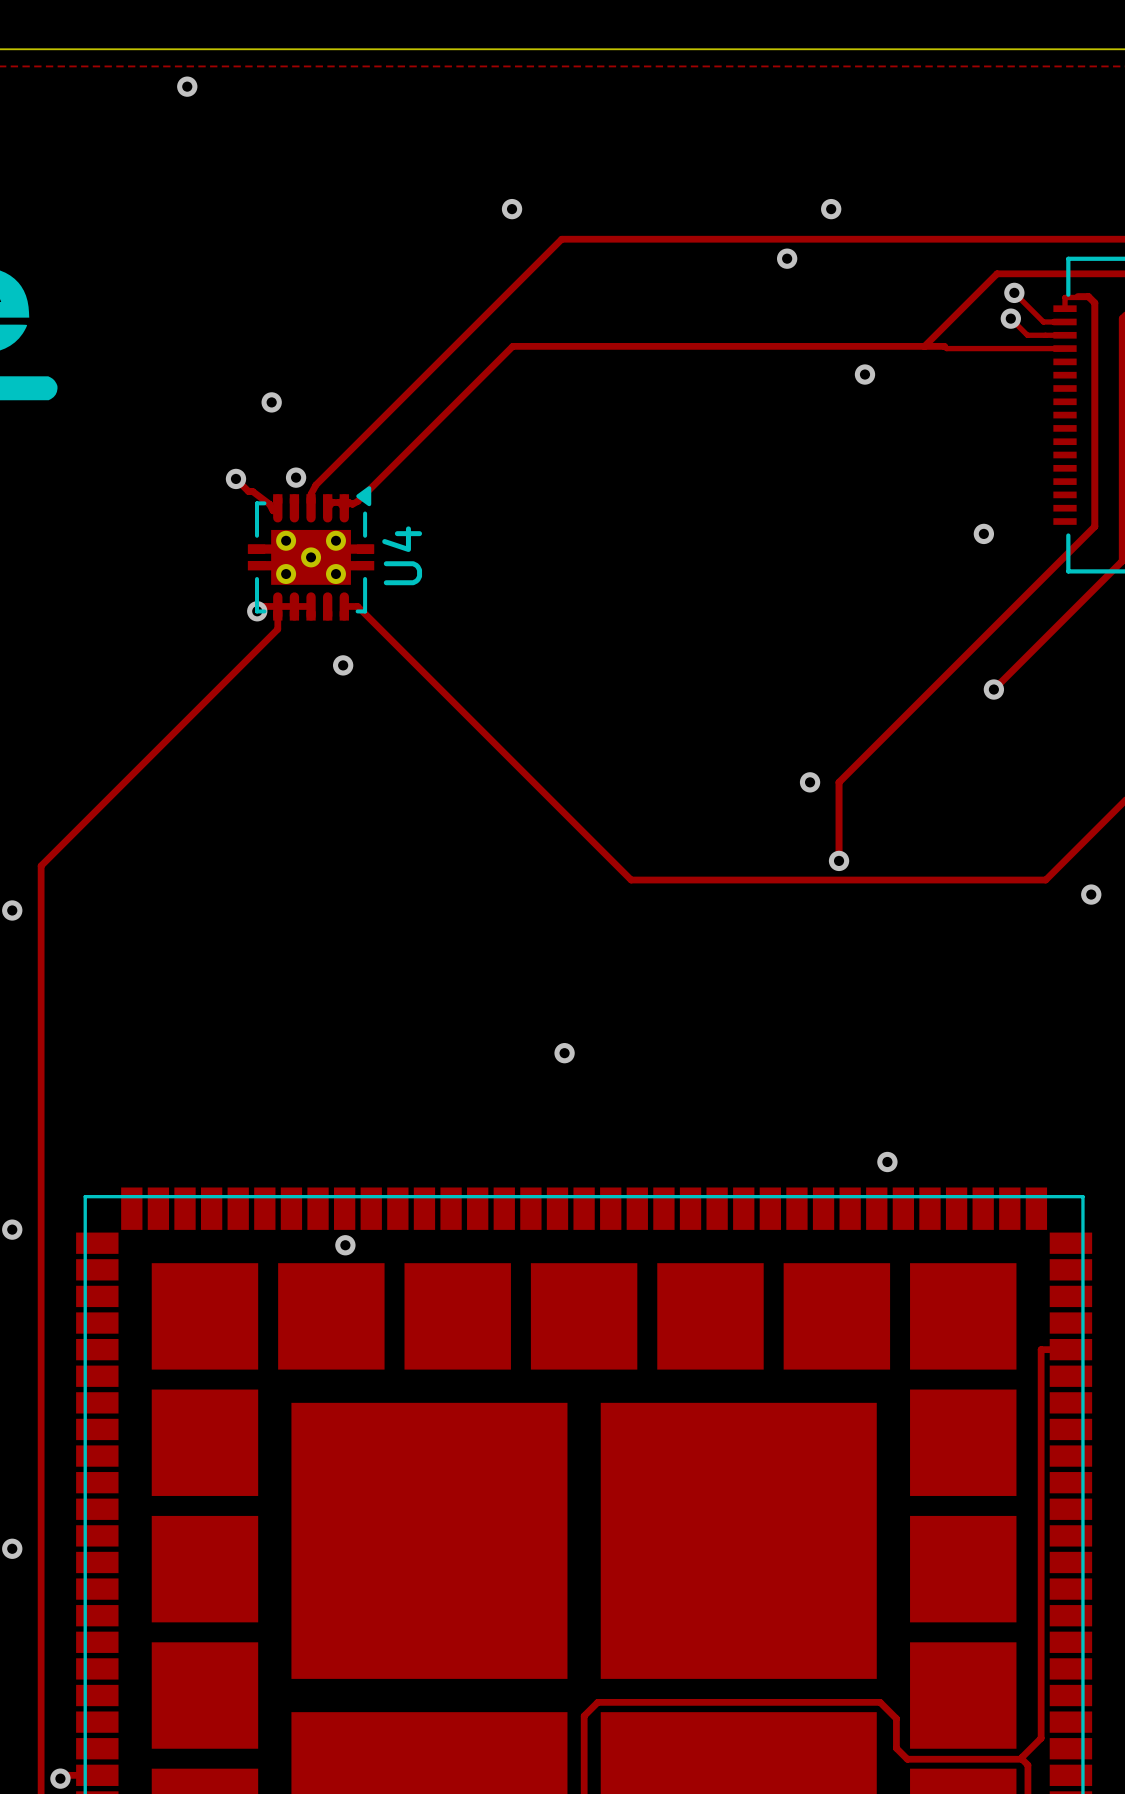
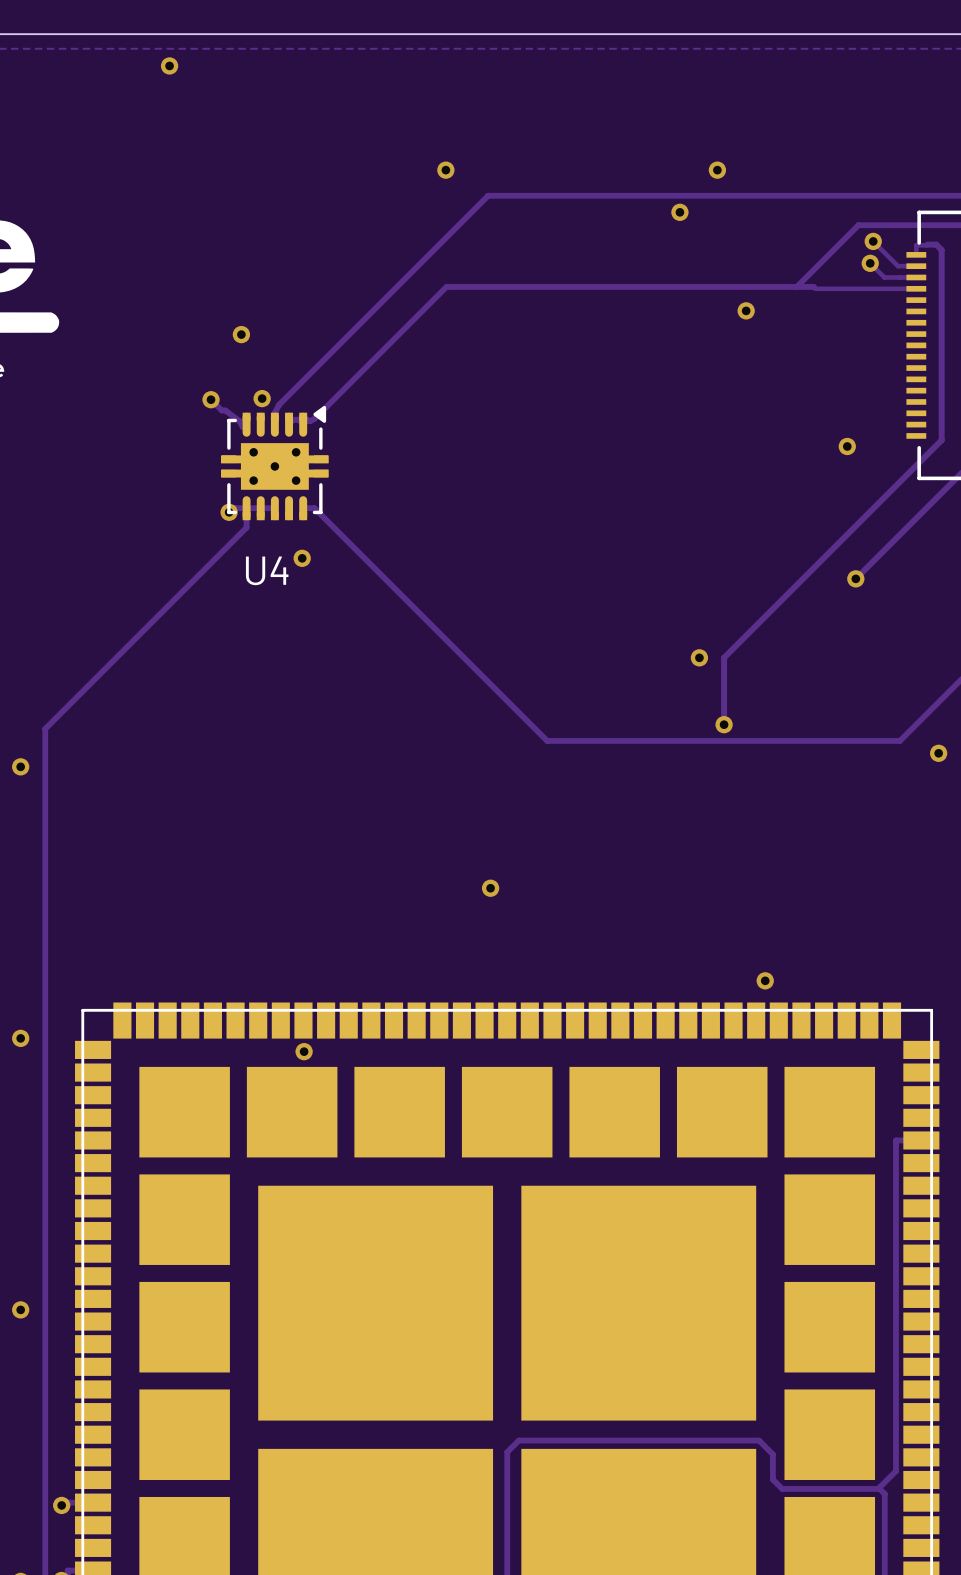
U4 name rotation: 0° (402, 555) -> 90° clockwise (267, 570)
U4 name position: U4 (402, 555) -> U4 (267, 570)

